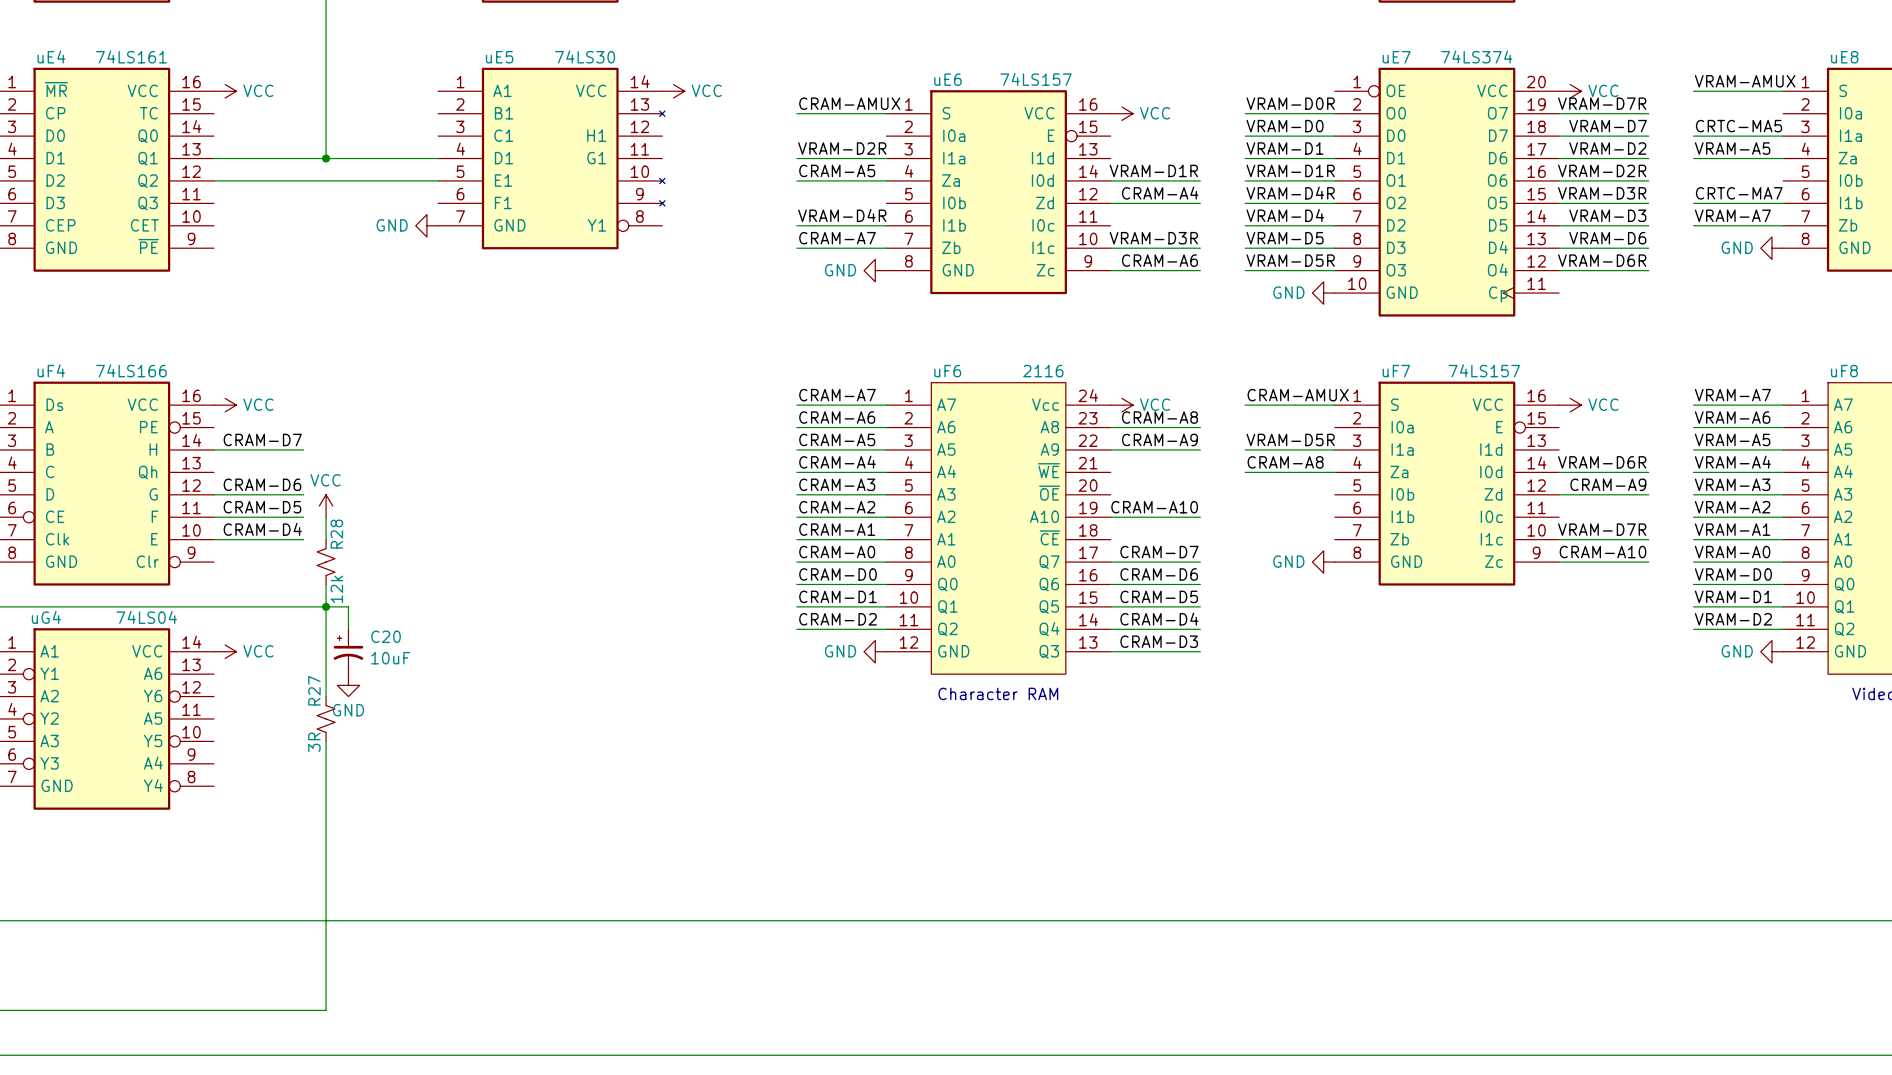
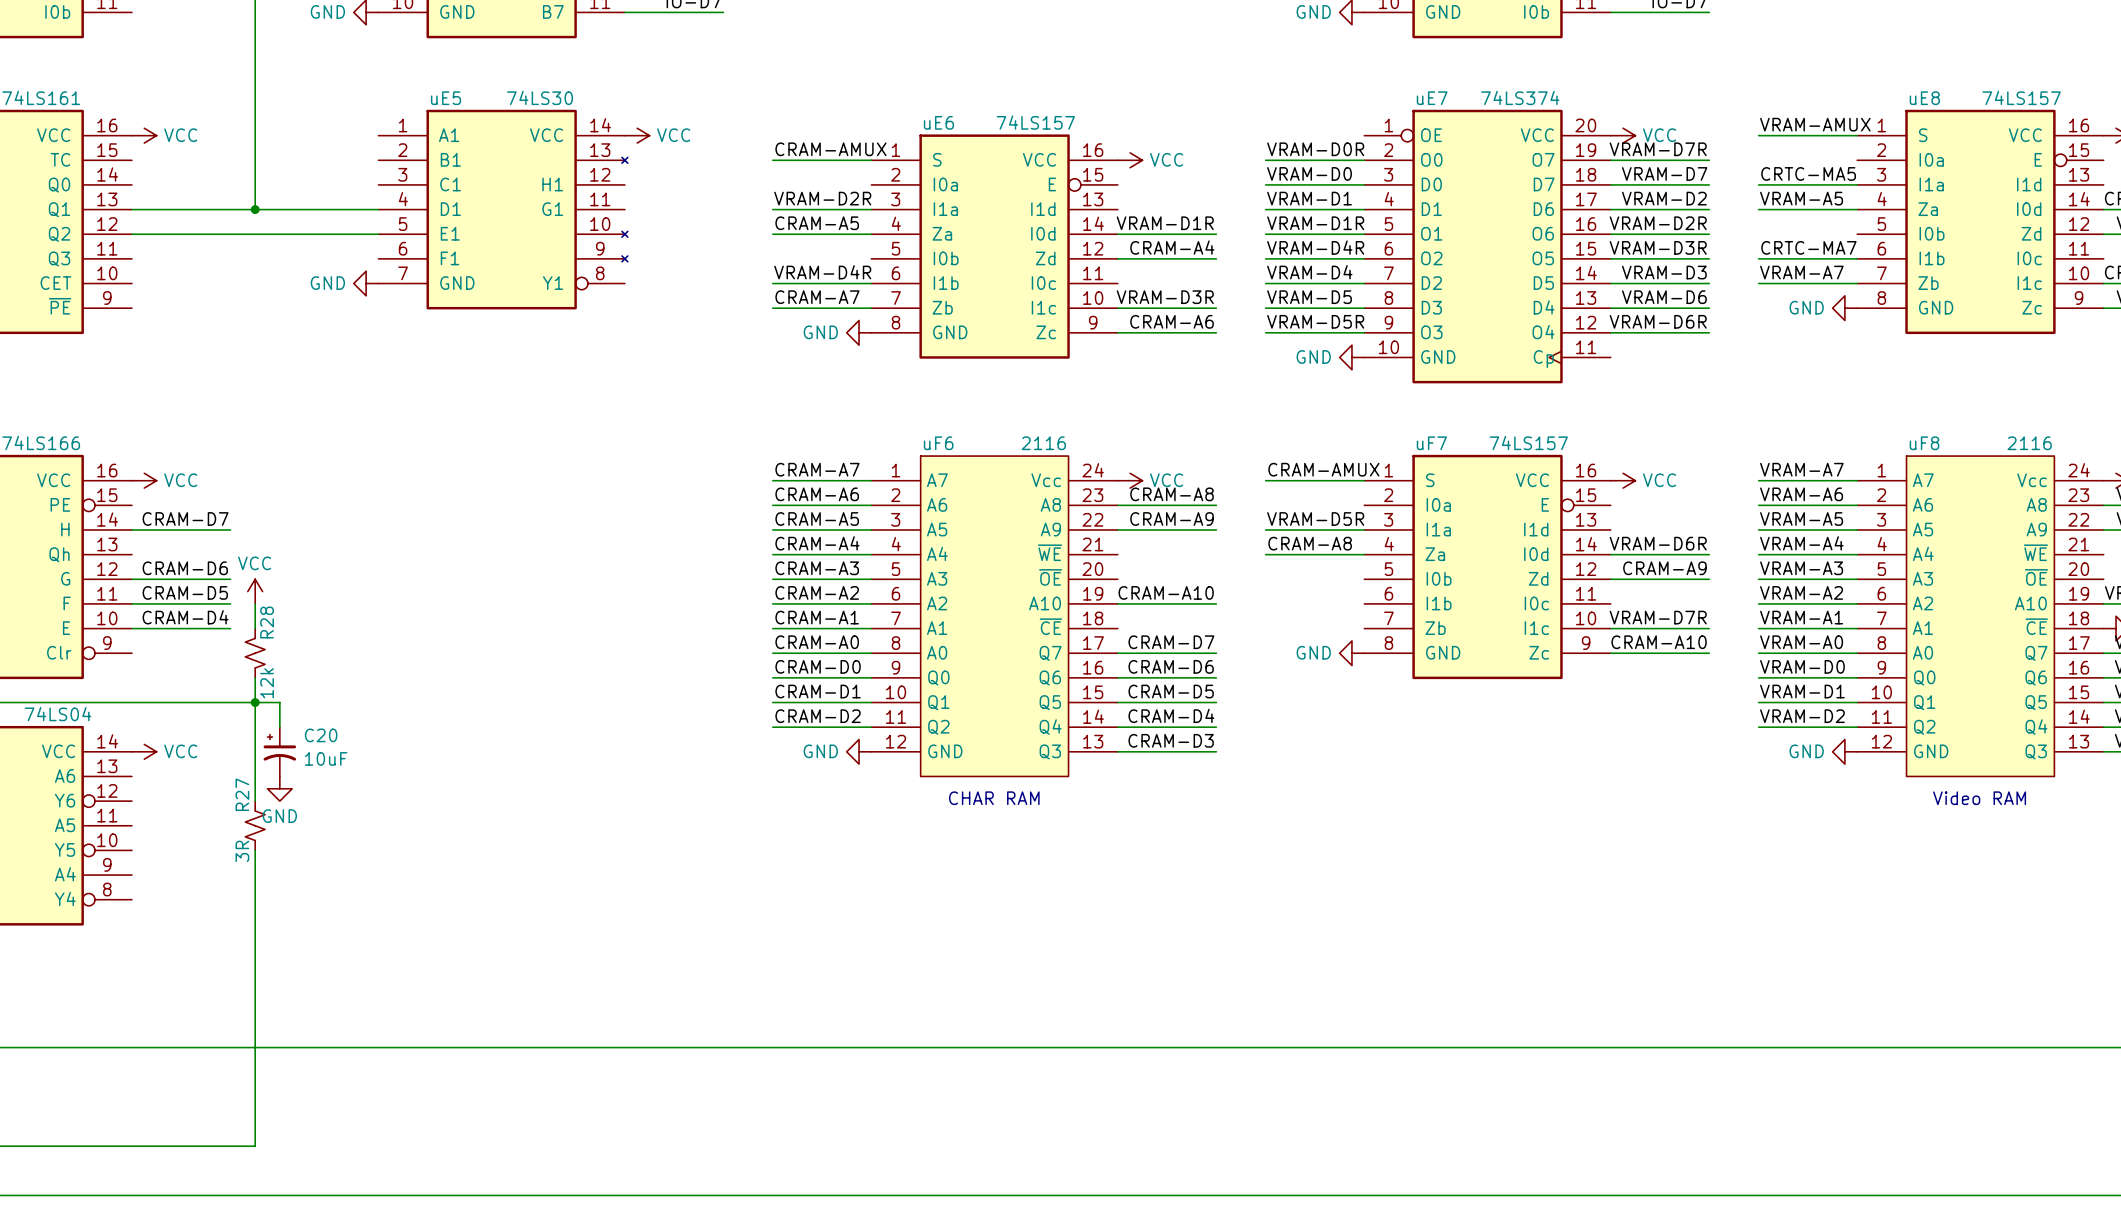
text: Character RAM (998, 693) -> CHAR RAM (994, 798)

